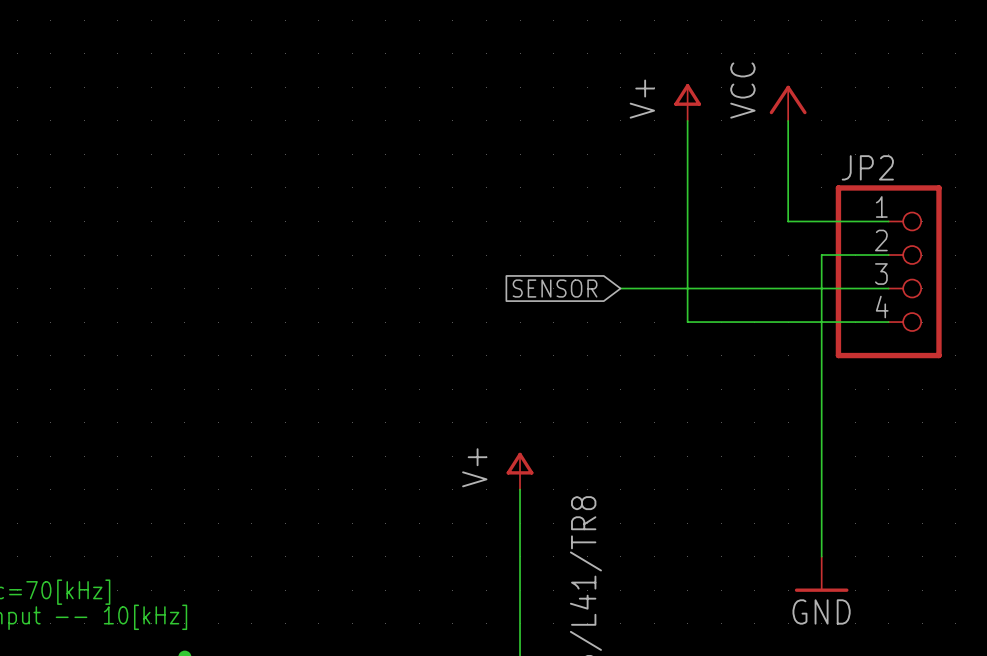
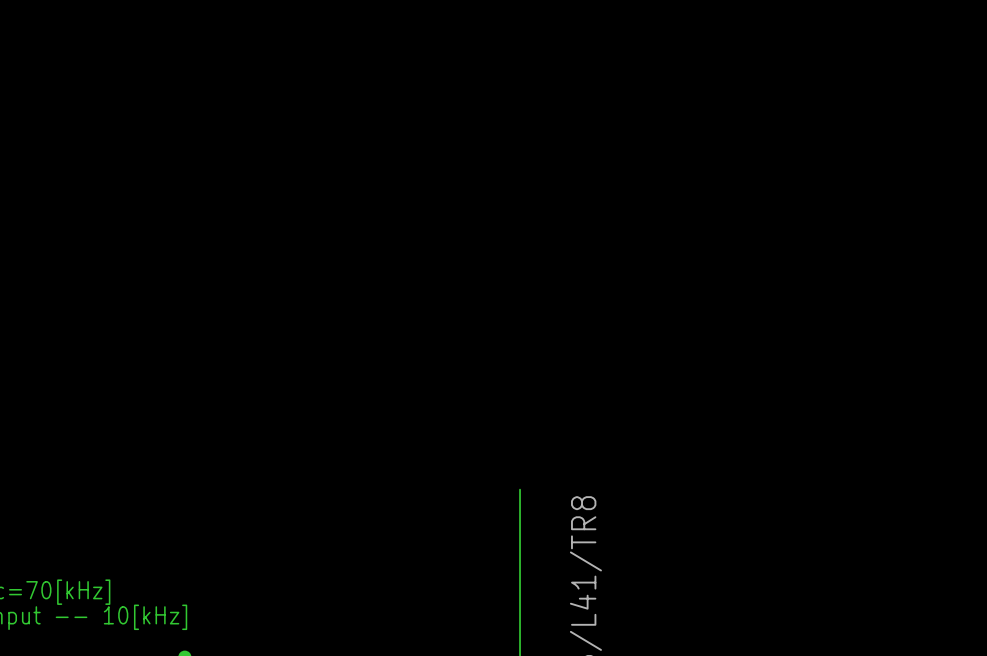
power symbol: V+ (687, 102) -> none
power symbol: VCC (788, 103) -> none
wire: (687, 120) (687, 322) (888, 322) -> none
wire: (788, 120) (788, 221) (888, 221) -> none
wire: (888, 255) (821, 255) (821, 556) -> none
JP2: (888, 271) -> none
global label: SENSOR (555, 288) -> none
wire: (620, 288) (888, 288) -> none
power symbol: V+ (520, 471) -> none
power symbol: GND (821, 574) -> none

